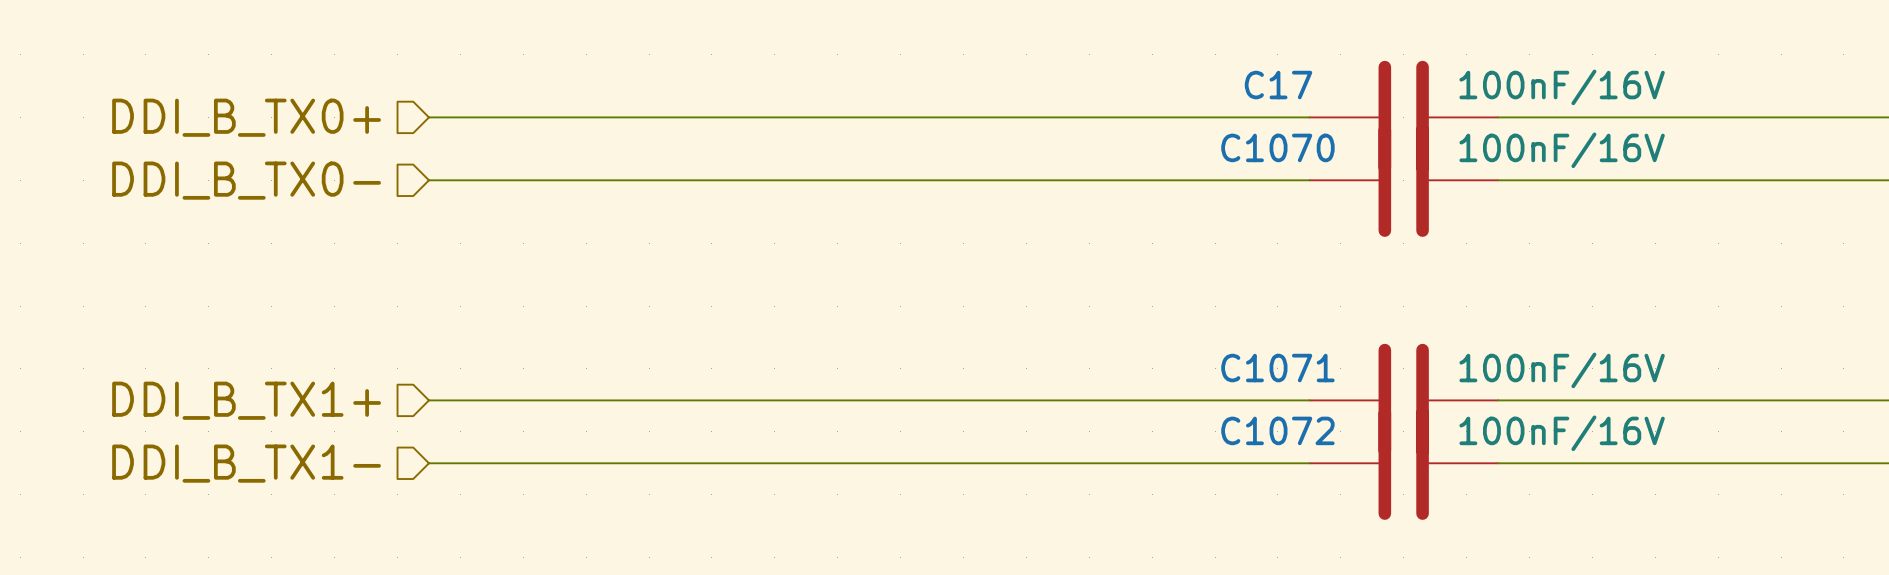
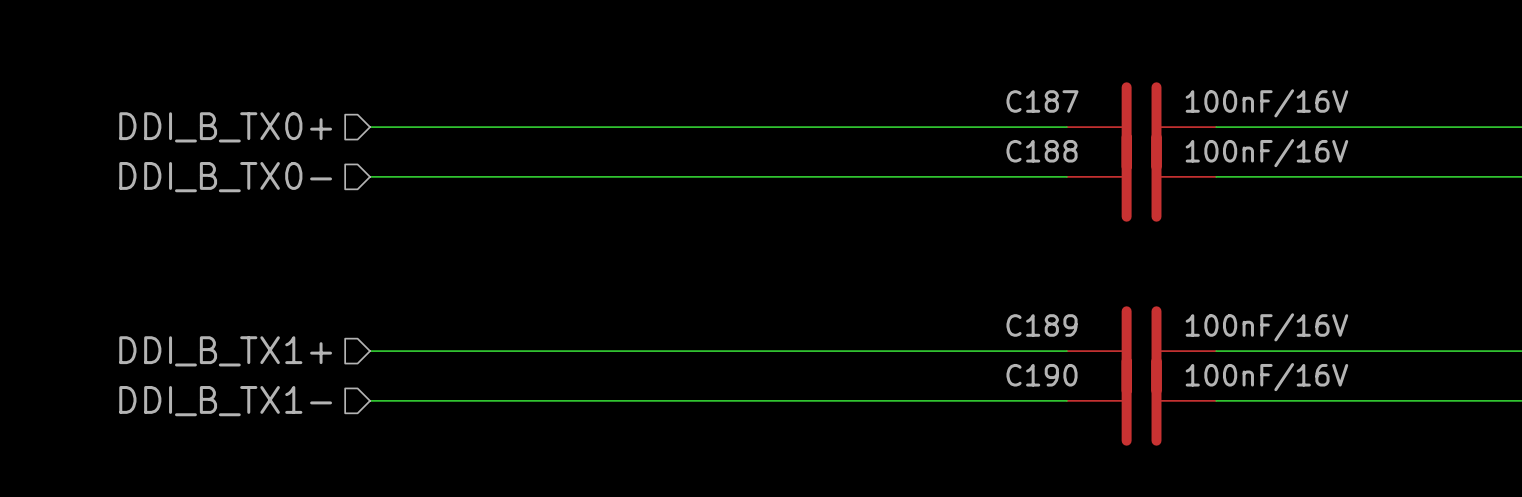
C17 name: C17 (1278, 85) -> C187 (1042, 101)
C1070 name: C1070 (1277, 147) -> C188 (1042, 151)
C1071 name: C1071 (1277, 368) -> C189 (1042, 325)
C1072 name: C1072 (1277, 430) -> C190 (1042, 375)

